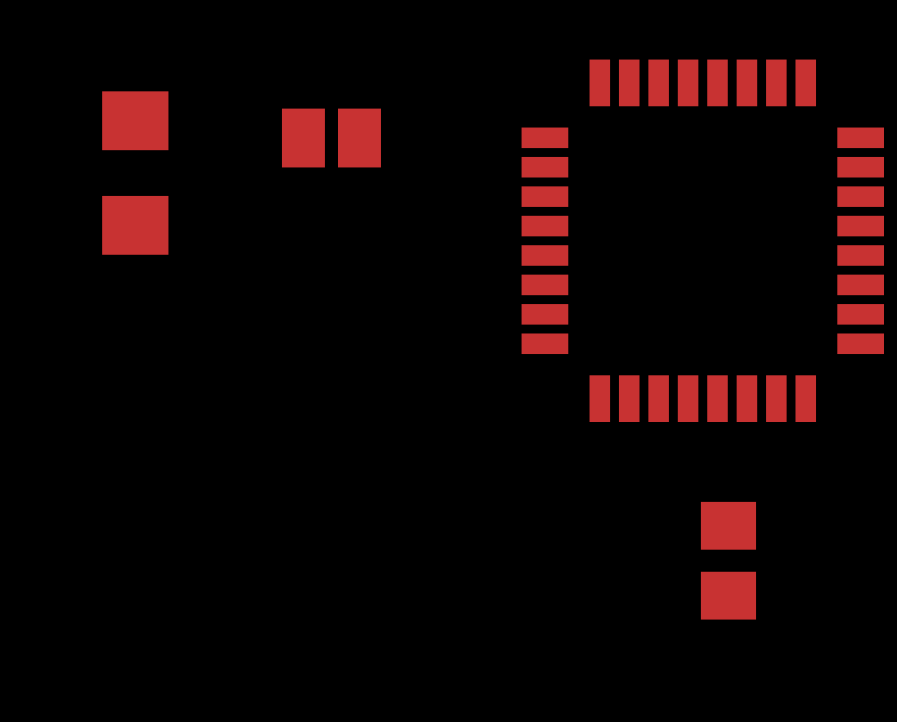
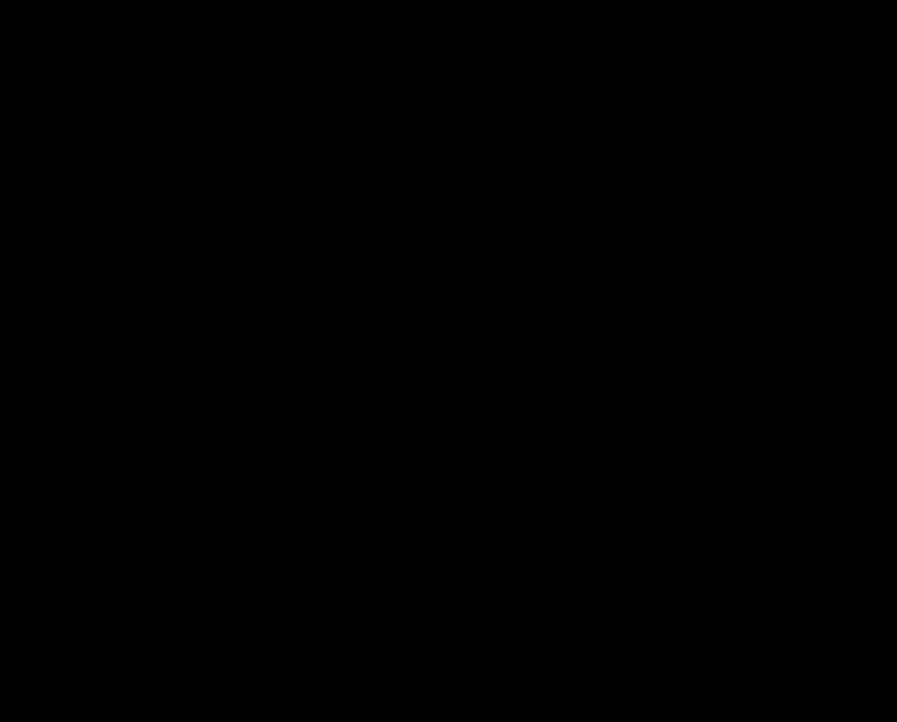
part: (331, 138) -> none
part: (135, 173) -> none
part: (702, 240) -> none
part: (728, 560) -> none

